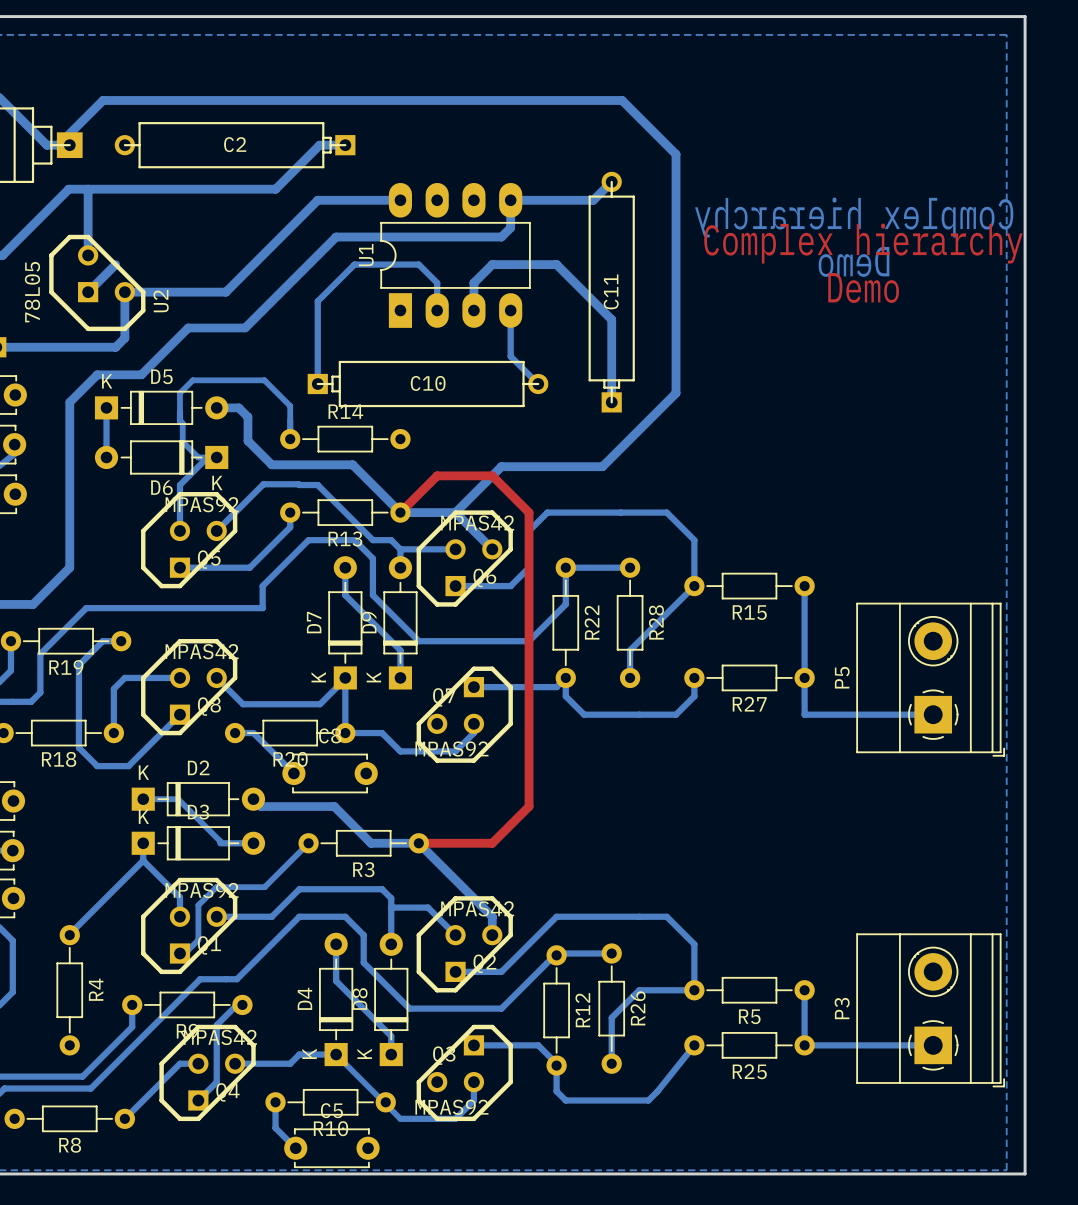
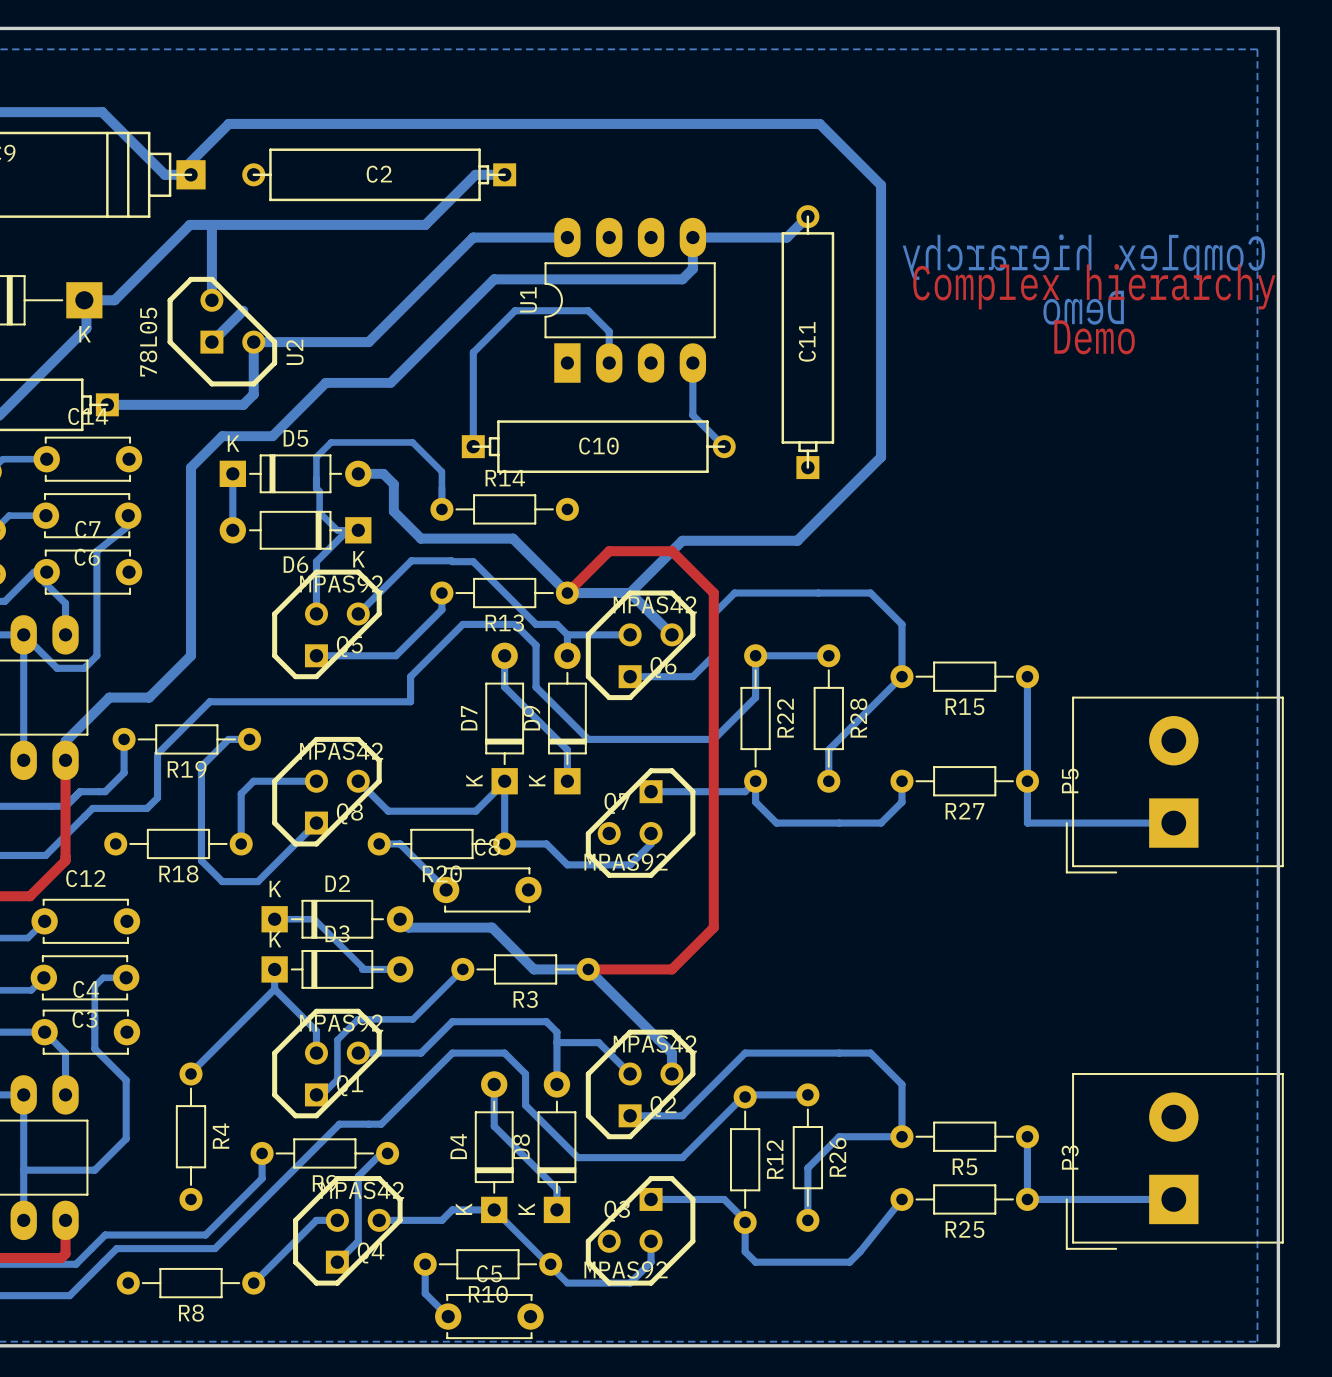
bottom track: (473, 310) (473, 282) (492, 264) (556, 264) (611, 319) (611, 402) -> none
P5 footprint: [856, 602, 1005, 757] -> [1065, 696, 1284, 874]
P3 footprint: [856, 933, 1005, 1088] -> [1065, 1073, 1284, 1250]

